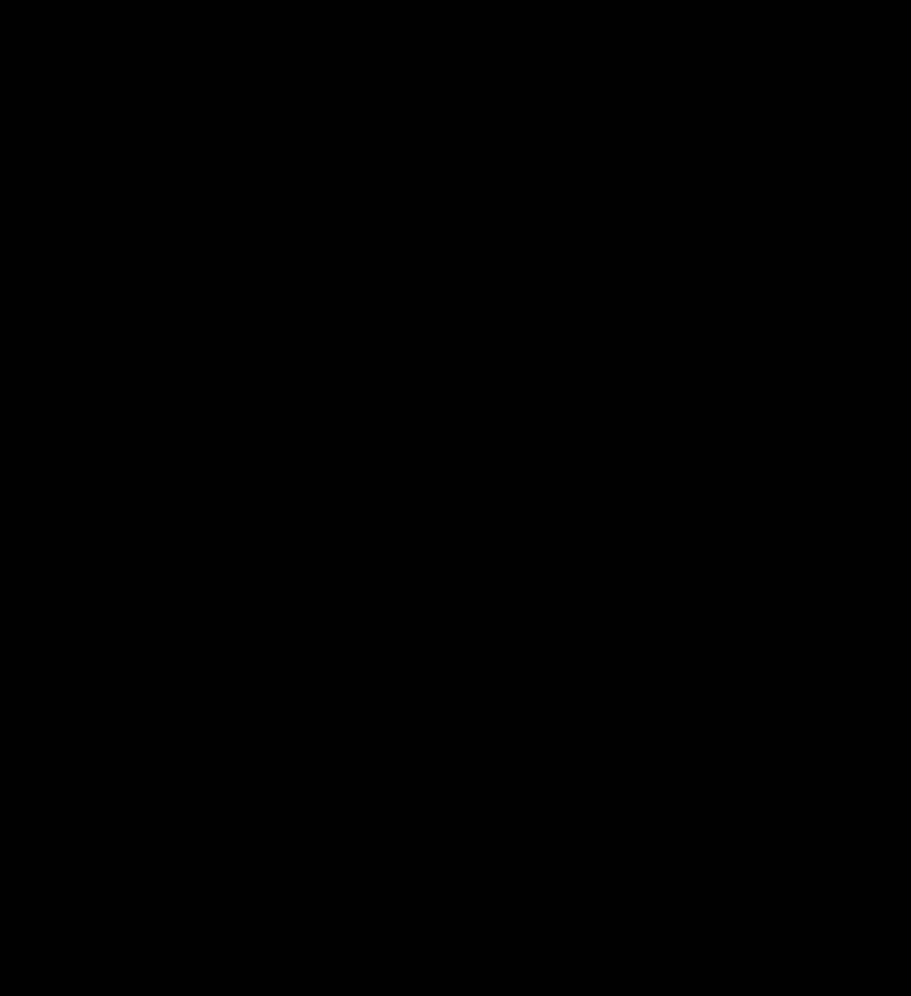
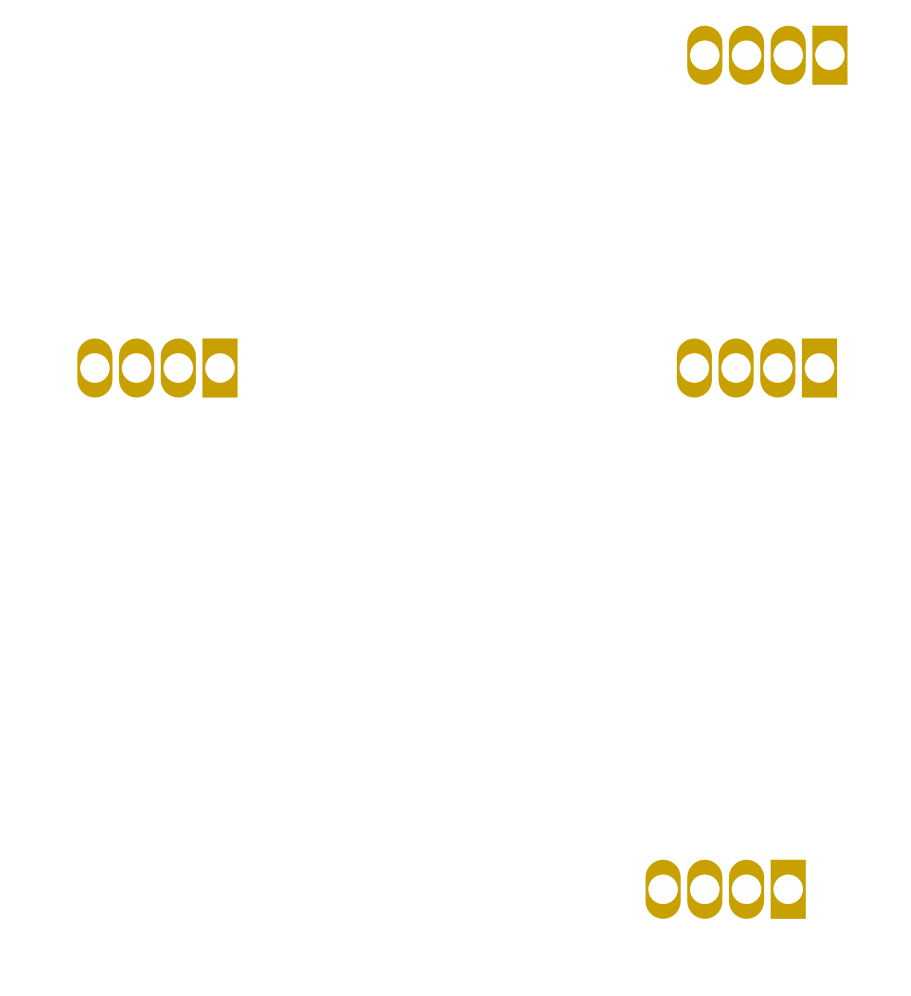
part: none -> (767, 55)
part: none -> (157, 368)
part: none -> (756, 368)
part: none -> (725, 889)

